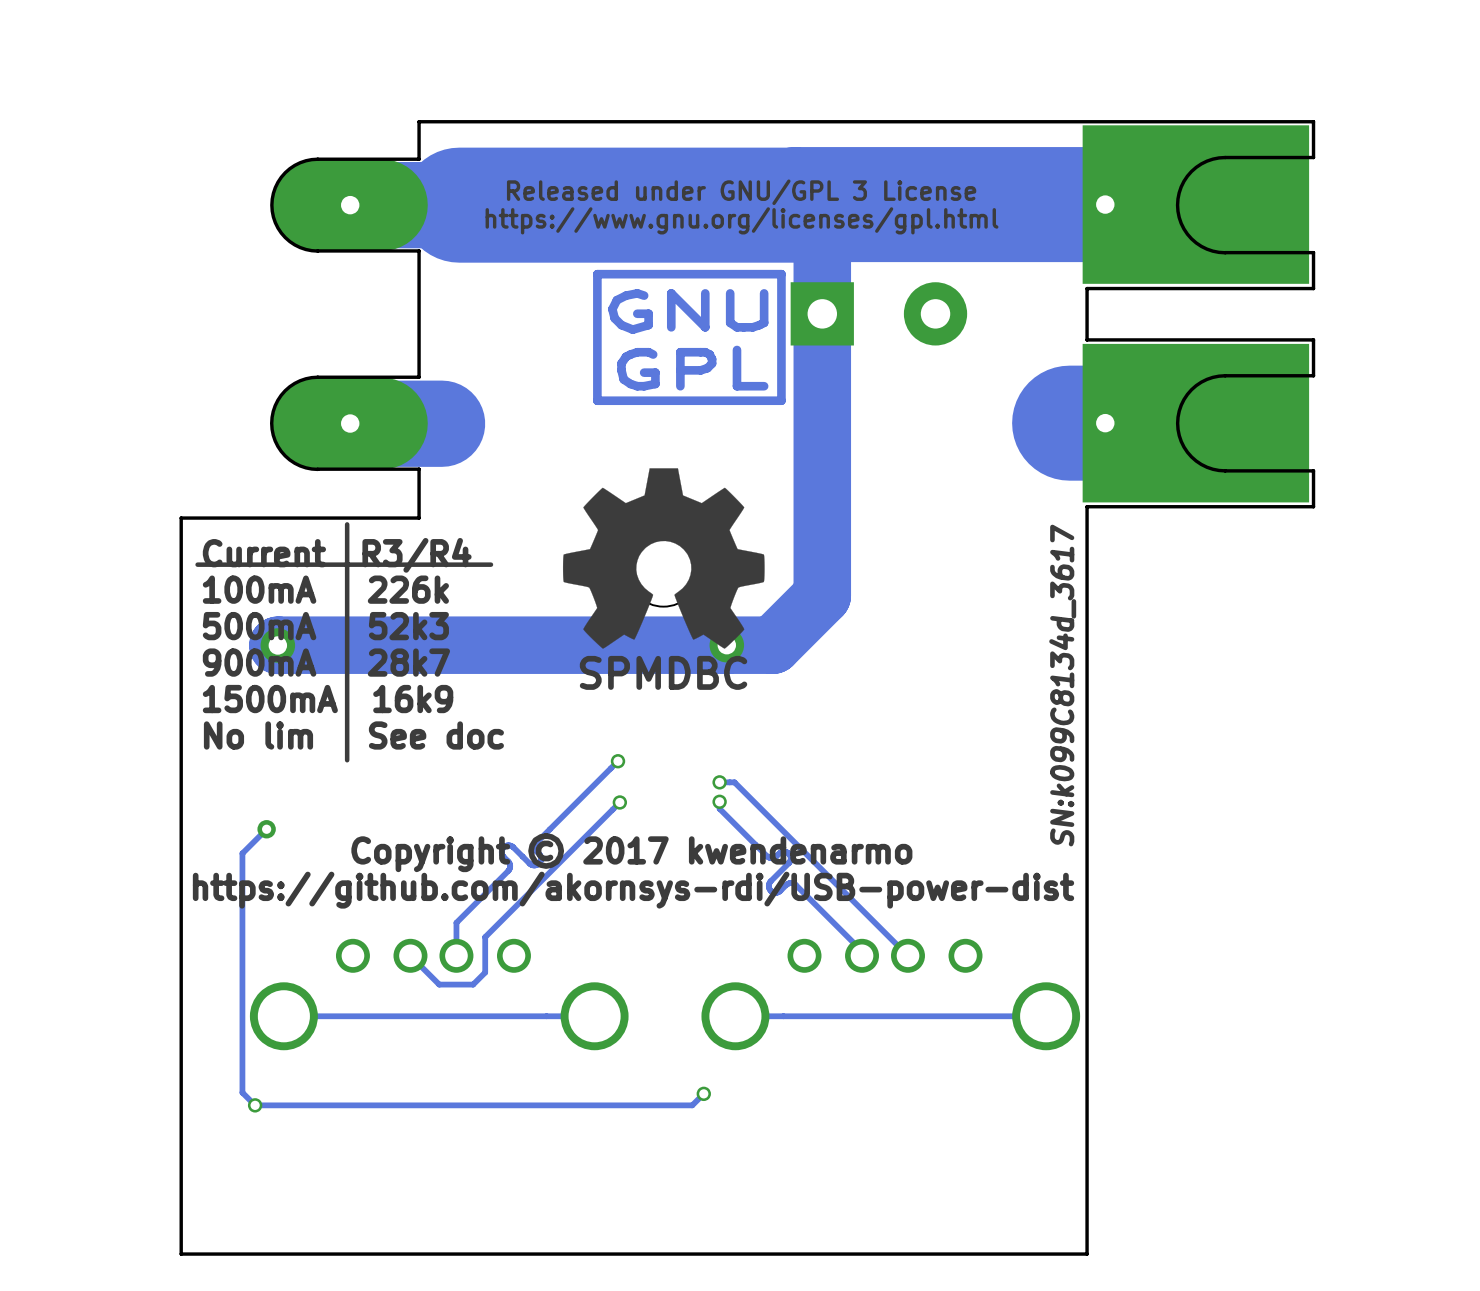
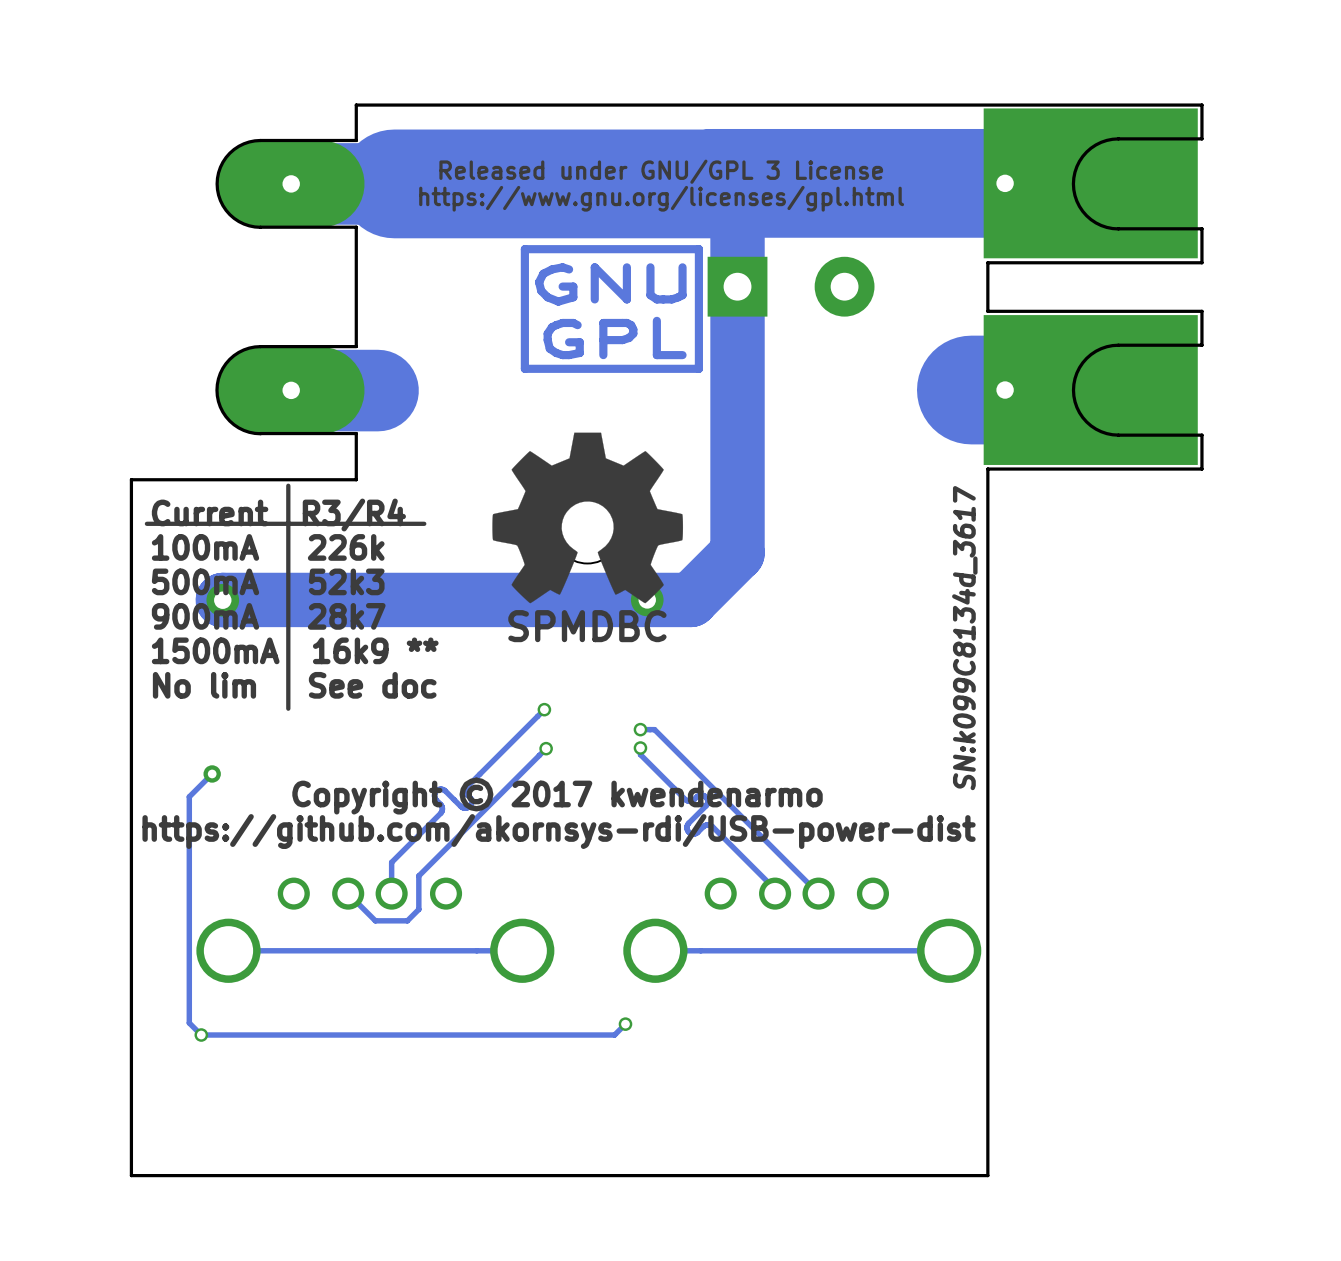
text: 1500mA 16k9 (328, 699) -> 1500mA 16k9 ** (295, 650)

